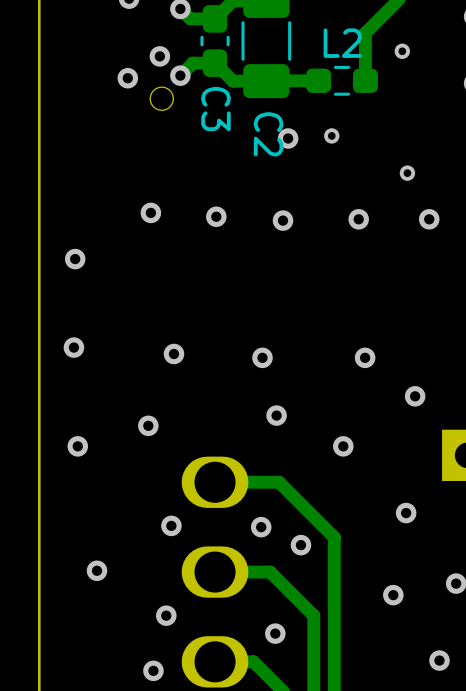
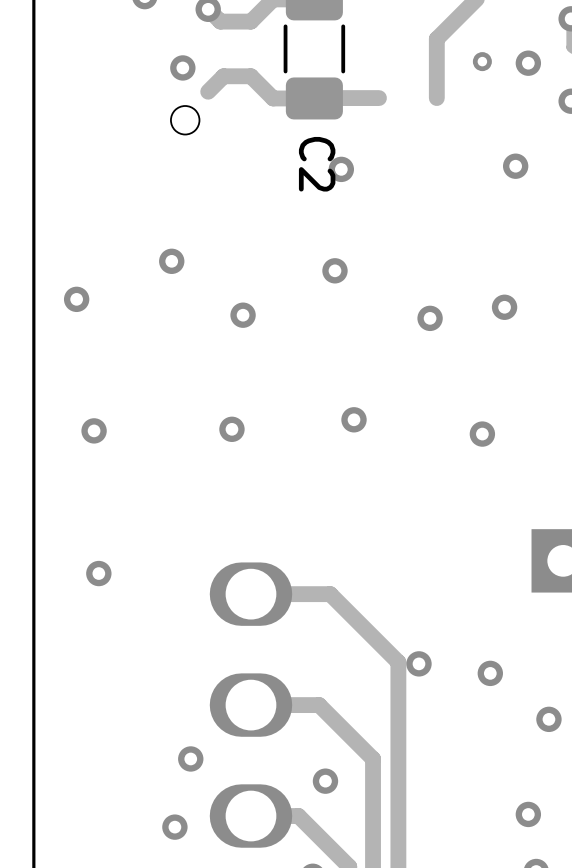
C3: (215, 41) -> none
via: none -> (528, 63)
via: (180, 75) -> none
via: (127, 78) -> none
L2: (342, 80) -> none
via: (331, 135) -> none
via: none -> (515, 166)
via: (407, 173) -> none
via position: (216, 216) -> (243, 315)
via: (358, 219) -> none
via position: (429, 219) -> (504, 307)
via position: (75, 259) -> (76, 299)
via: none -> (430, 318)
via: none -> (354, 419)
via position: (73, 347) -> (94, 430)
via: none -> (482, 434)
via position: (173, 354) -> (231, 429)
via: (262, 357) -> none
via: (365, 357) -> none
via: (415, 396) -> none
via: (276, 415) -> none
via: (148, 425) -> none
via position: (77, 446) -> (98, 573)
via: (343, 446) -> none
via: (406, 513) -> none
via: (171, 525) -> none
via: (261, 527) -> none
via: none -> (418, 663)
via: (300, 545) -> none
via: none -> (490, 673)
via: (97, 570) -> none
via: (393, 595) -> none

